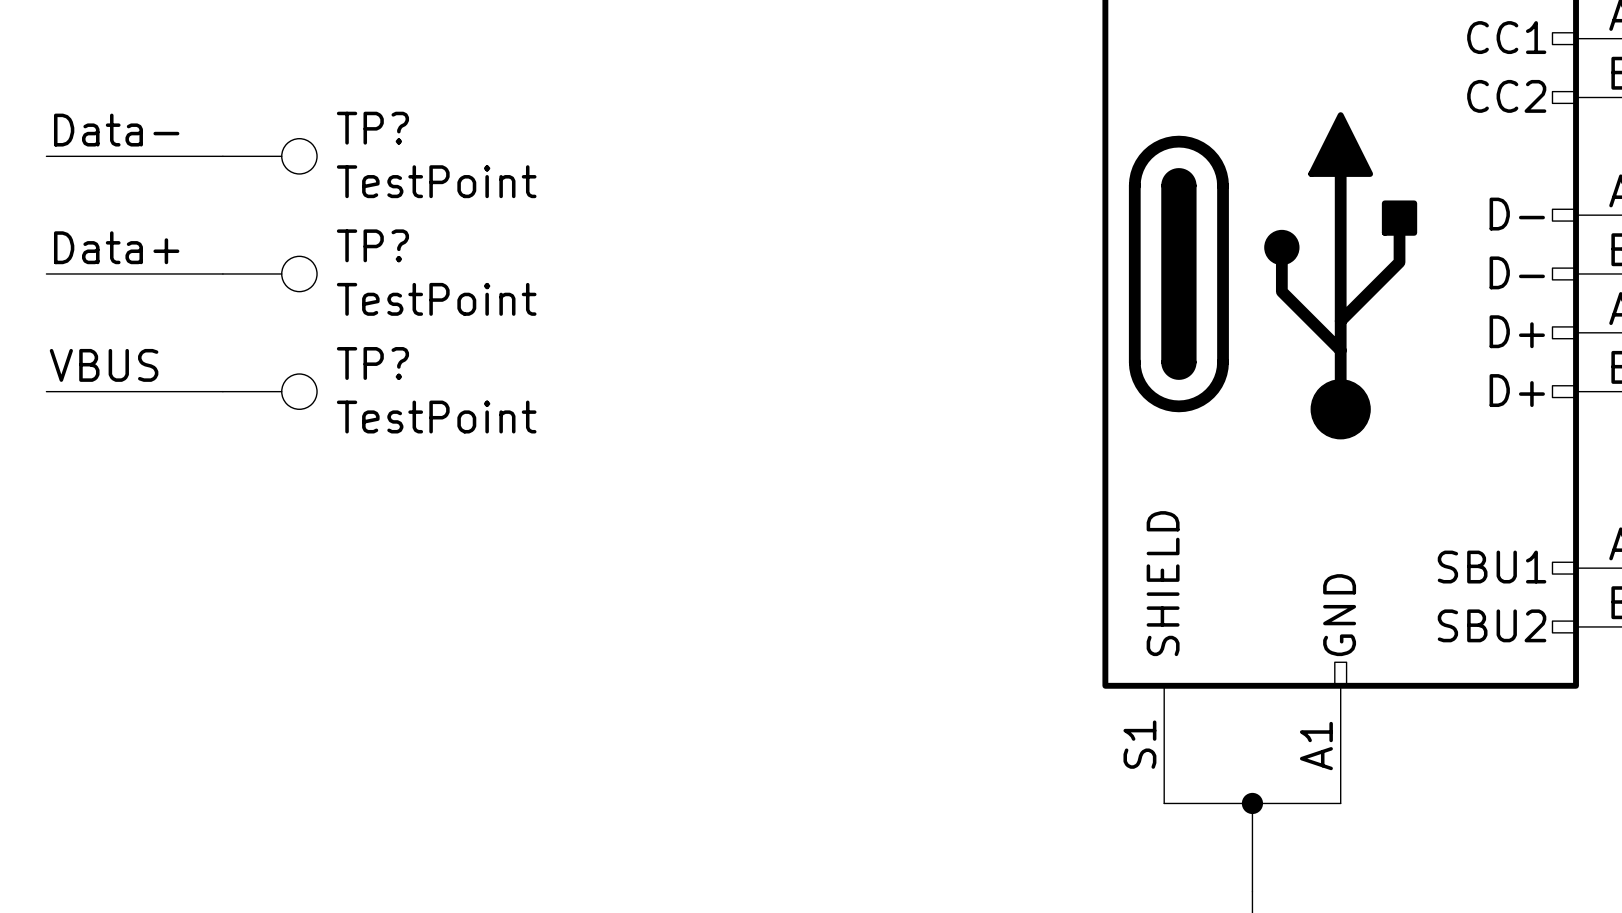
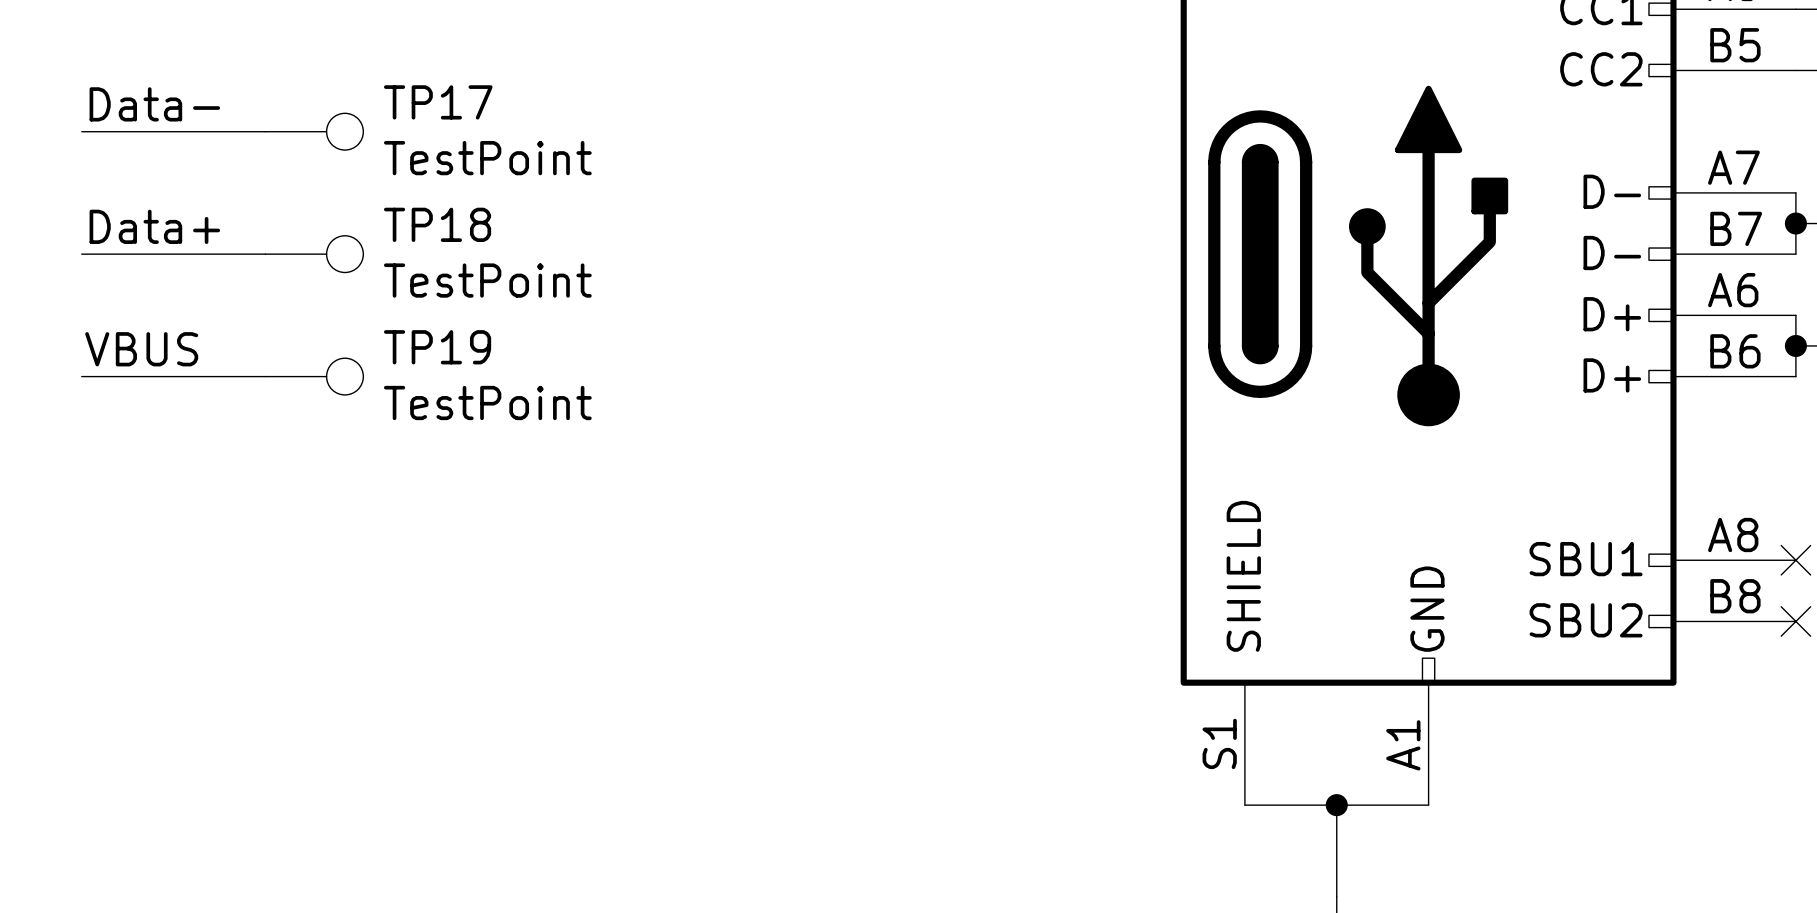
TP? name: TP? (372, 128) -> TP17 (438, 102)
TP? name: TP? (372, 245) -> TP18 (437, 224)
TP? name: TP? (372, 363) -> TP19 (437, 347)

